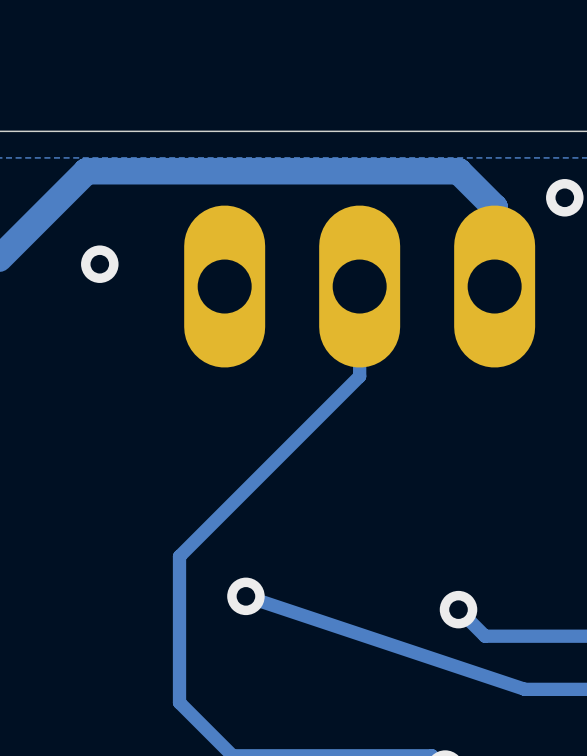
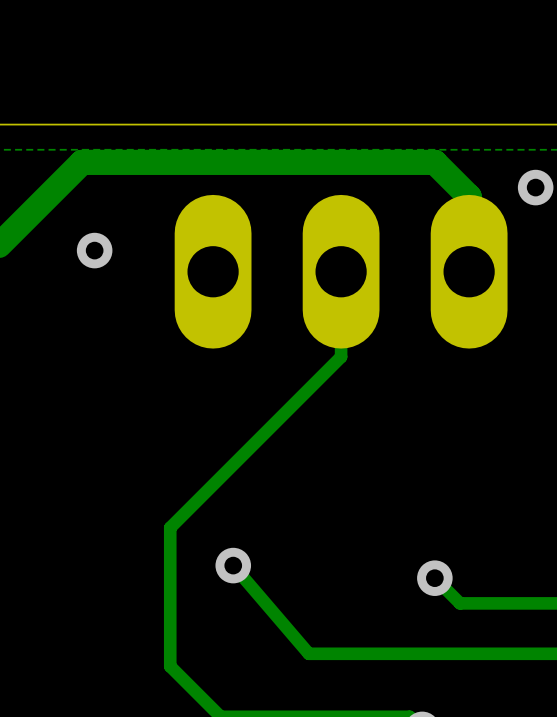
track: (245, 596) (524, 689) -> (233, 565) (308, 653) (497, 653)

